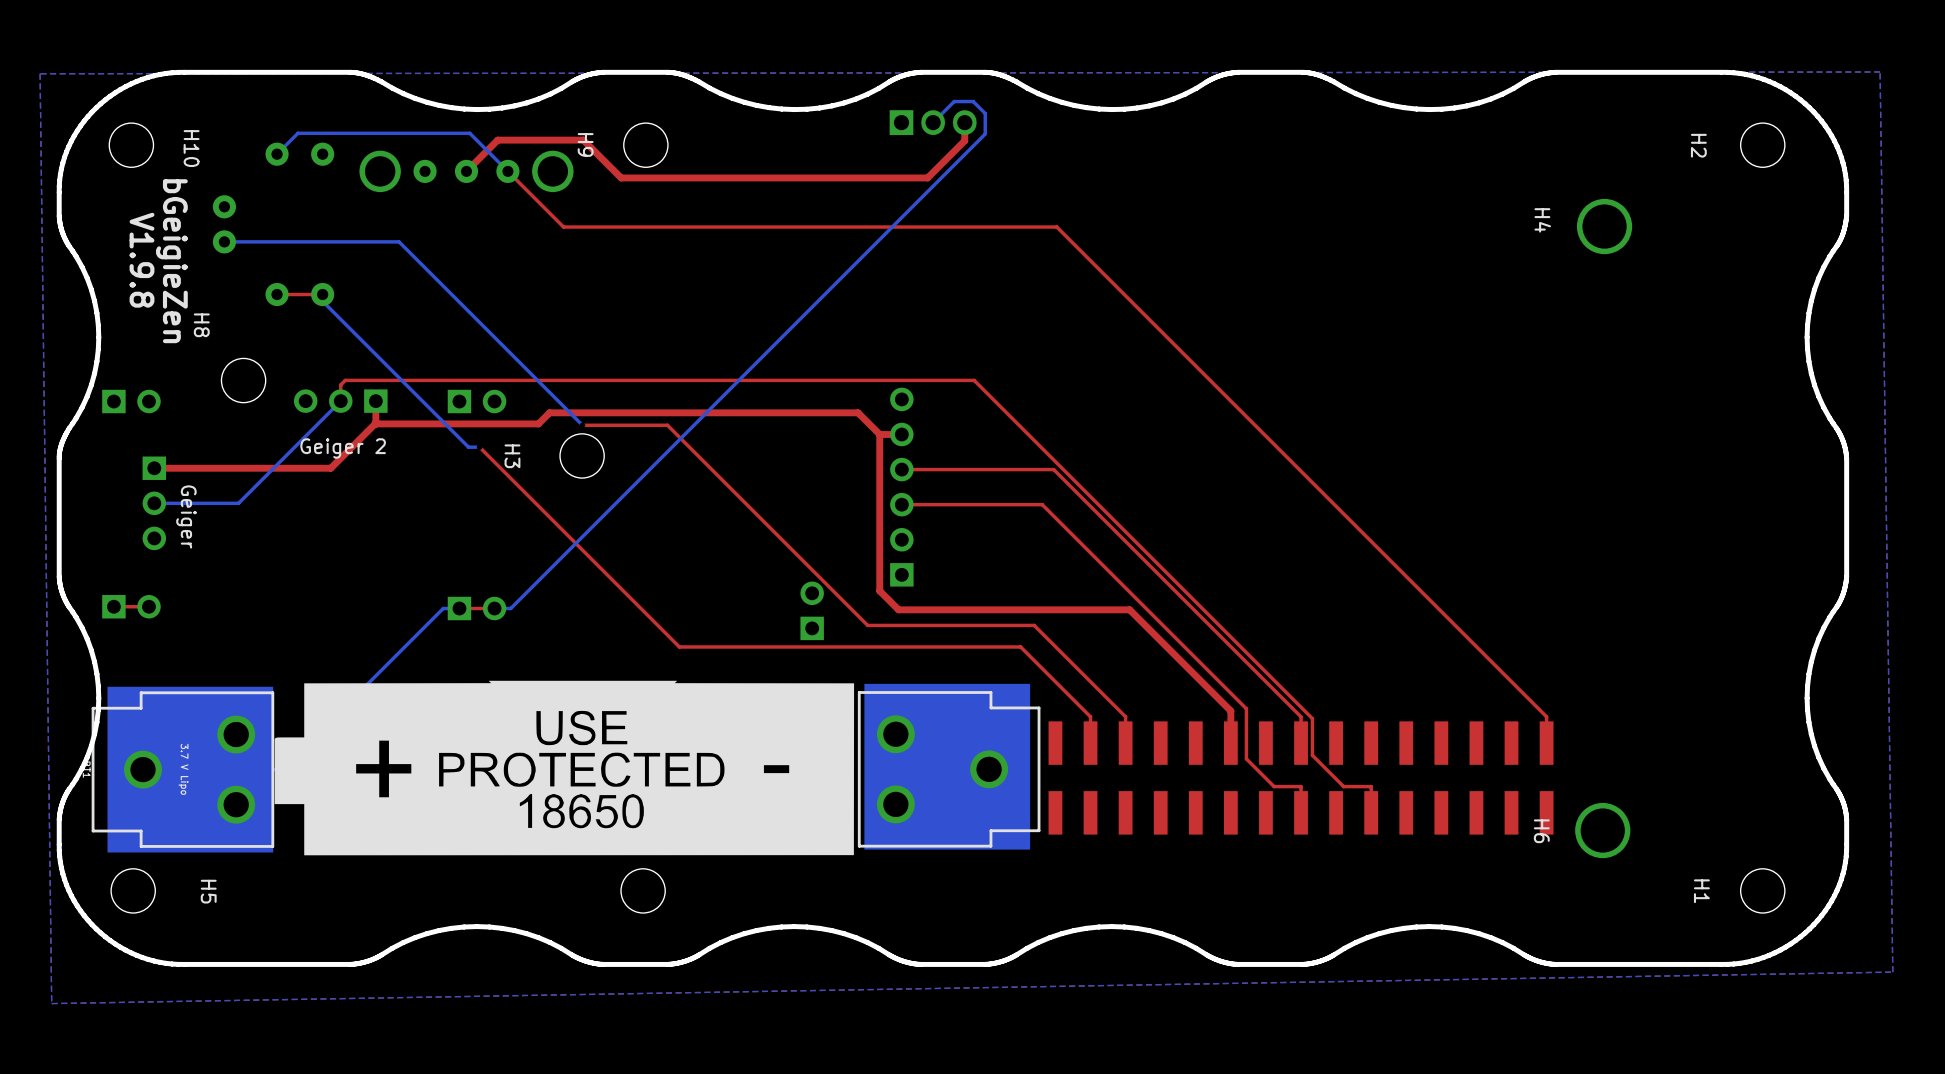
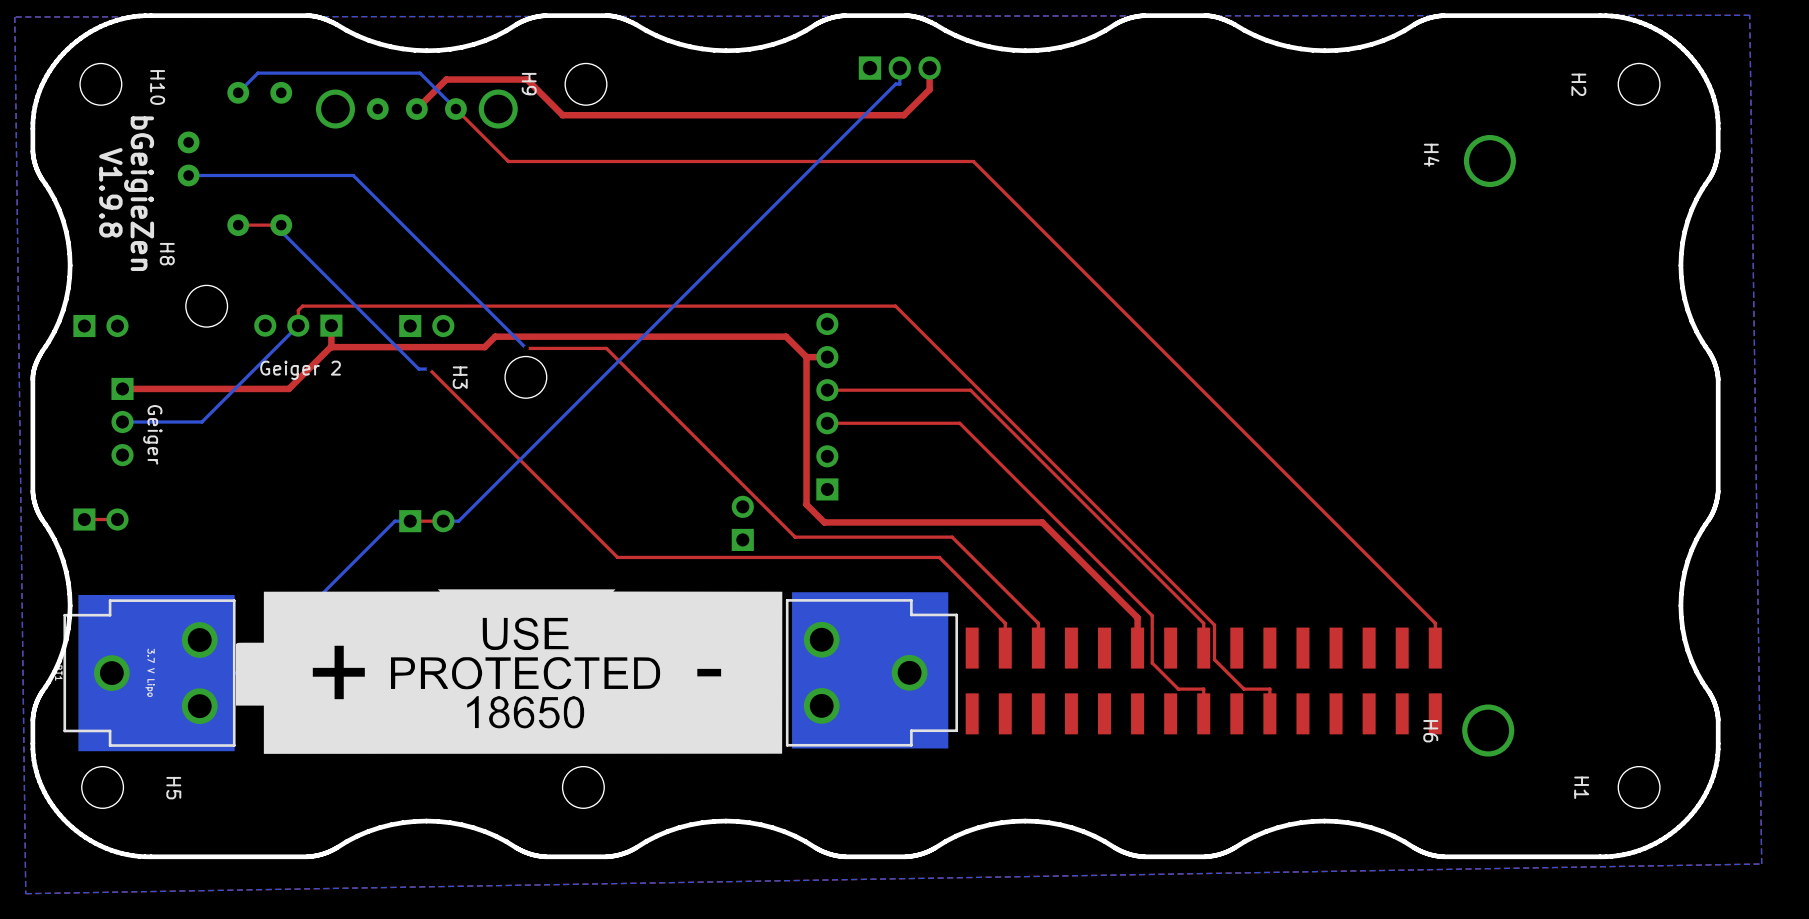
bottom track: (933, 122) (954, 101) (973, 101) (985, 113) (985, 134) (974, 144) -> (899, 68) (899, 84) (895, 84)
part position: (933, 122) -> (899, 68)
top track: (964, 122) (964, 140) (927, 177) -> (929, 68) (929, 89) (903, 115) (851, 115)

